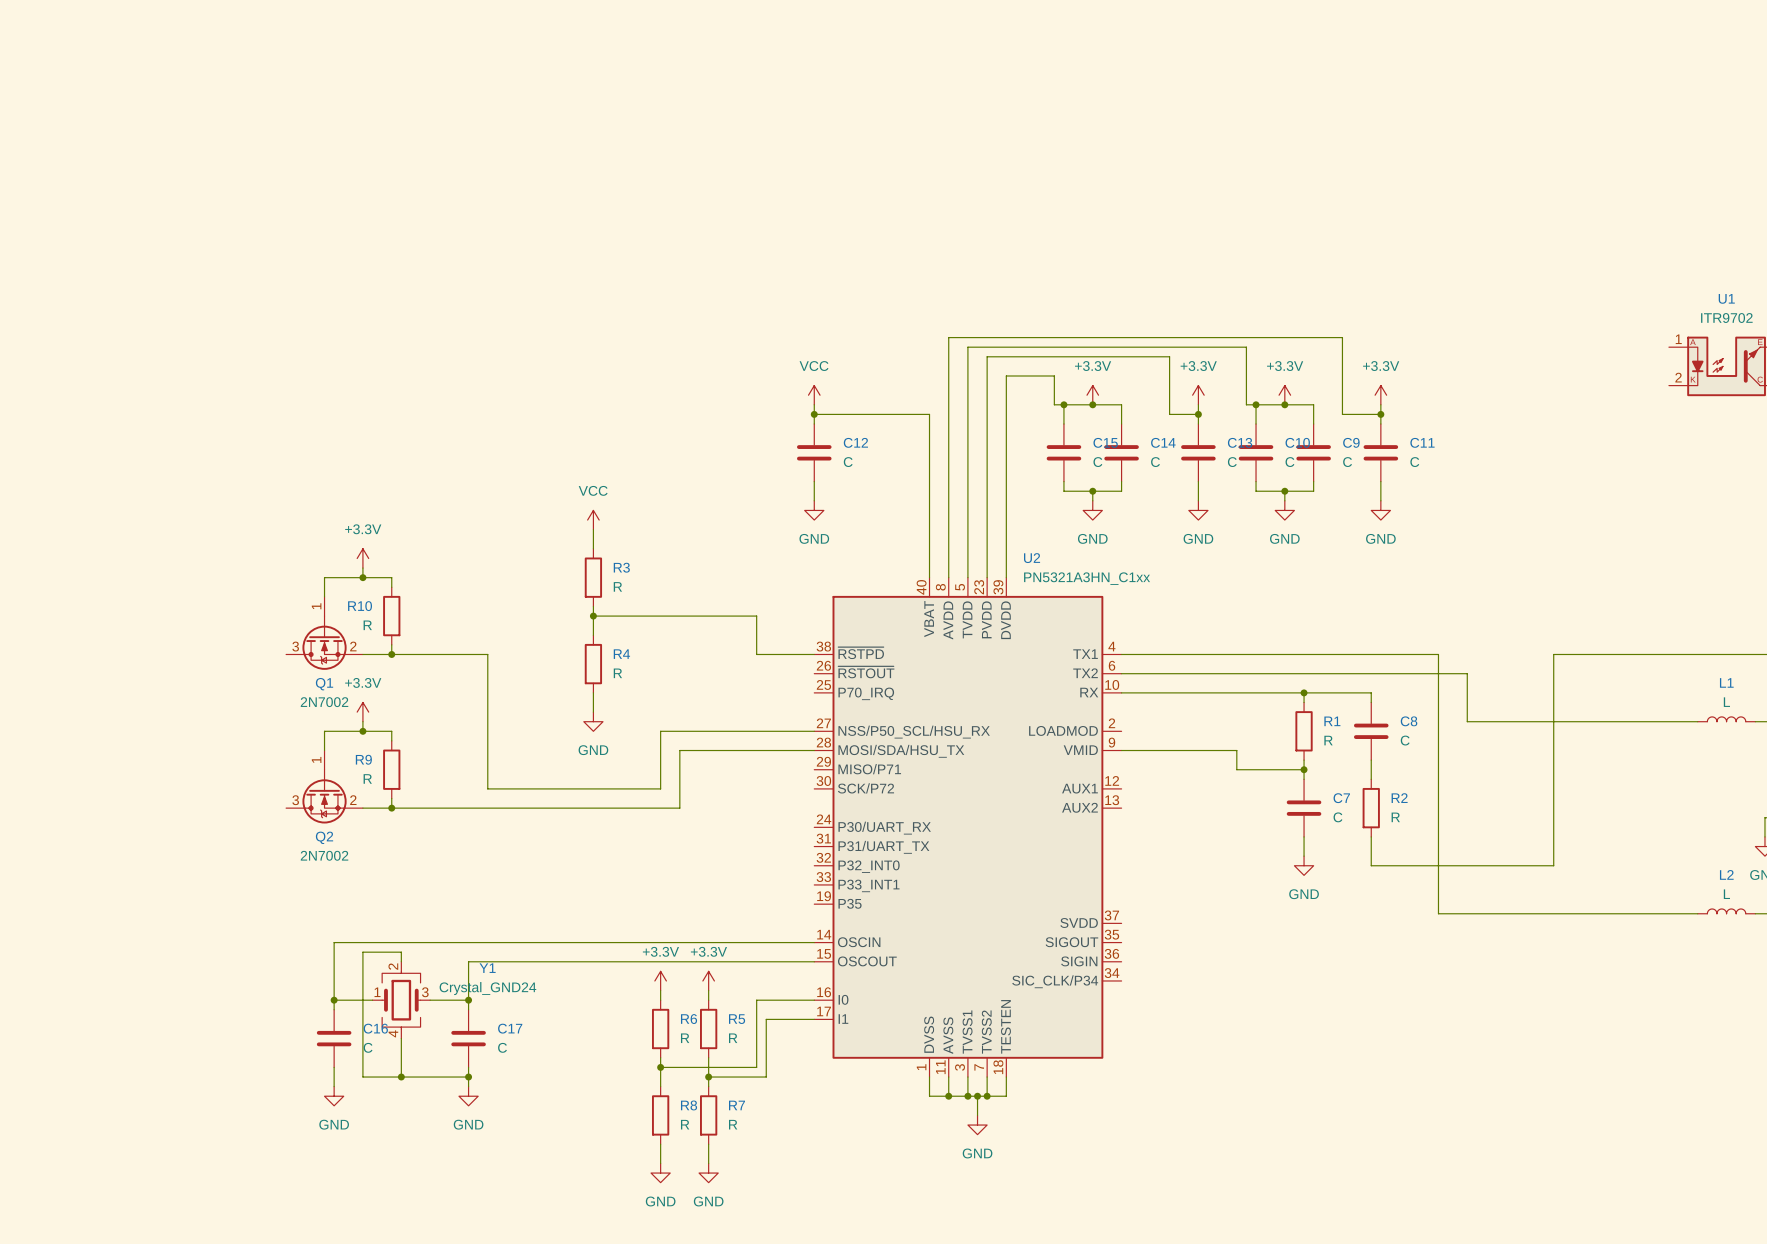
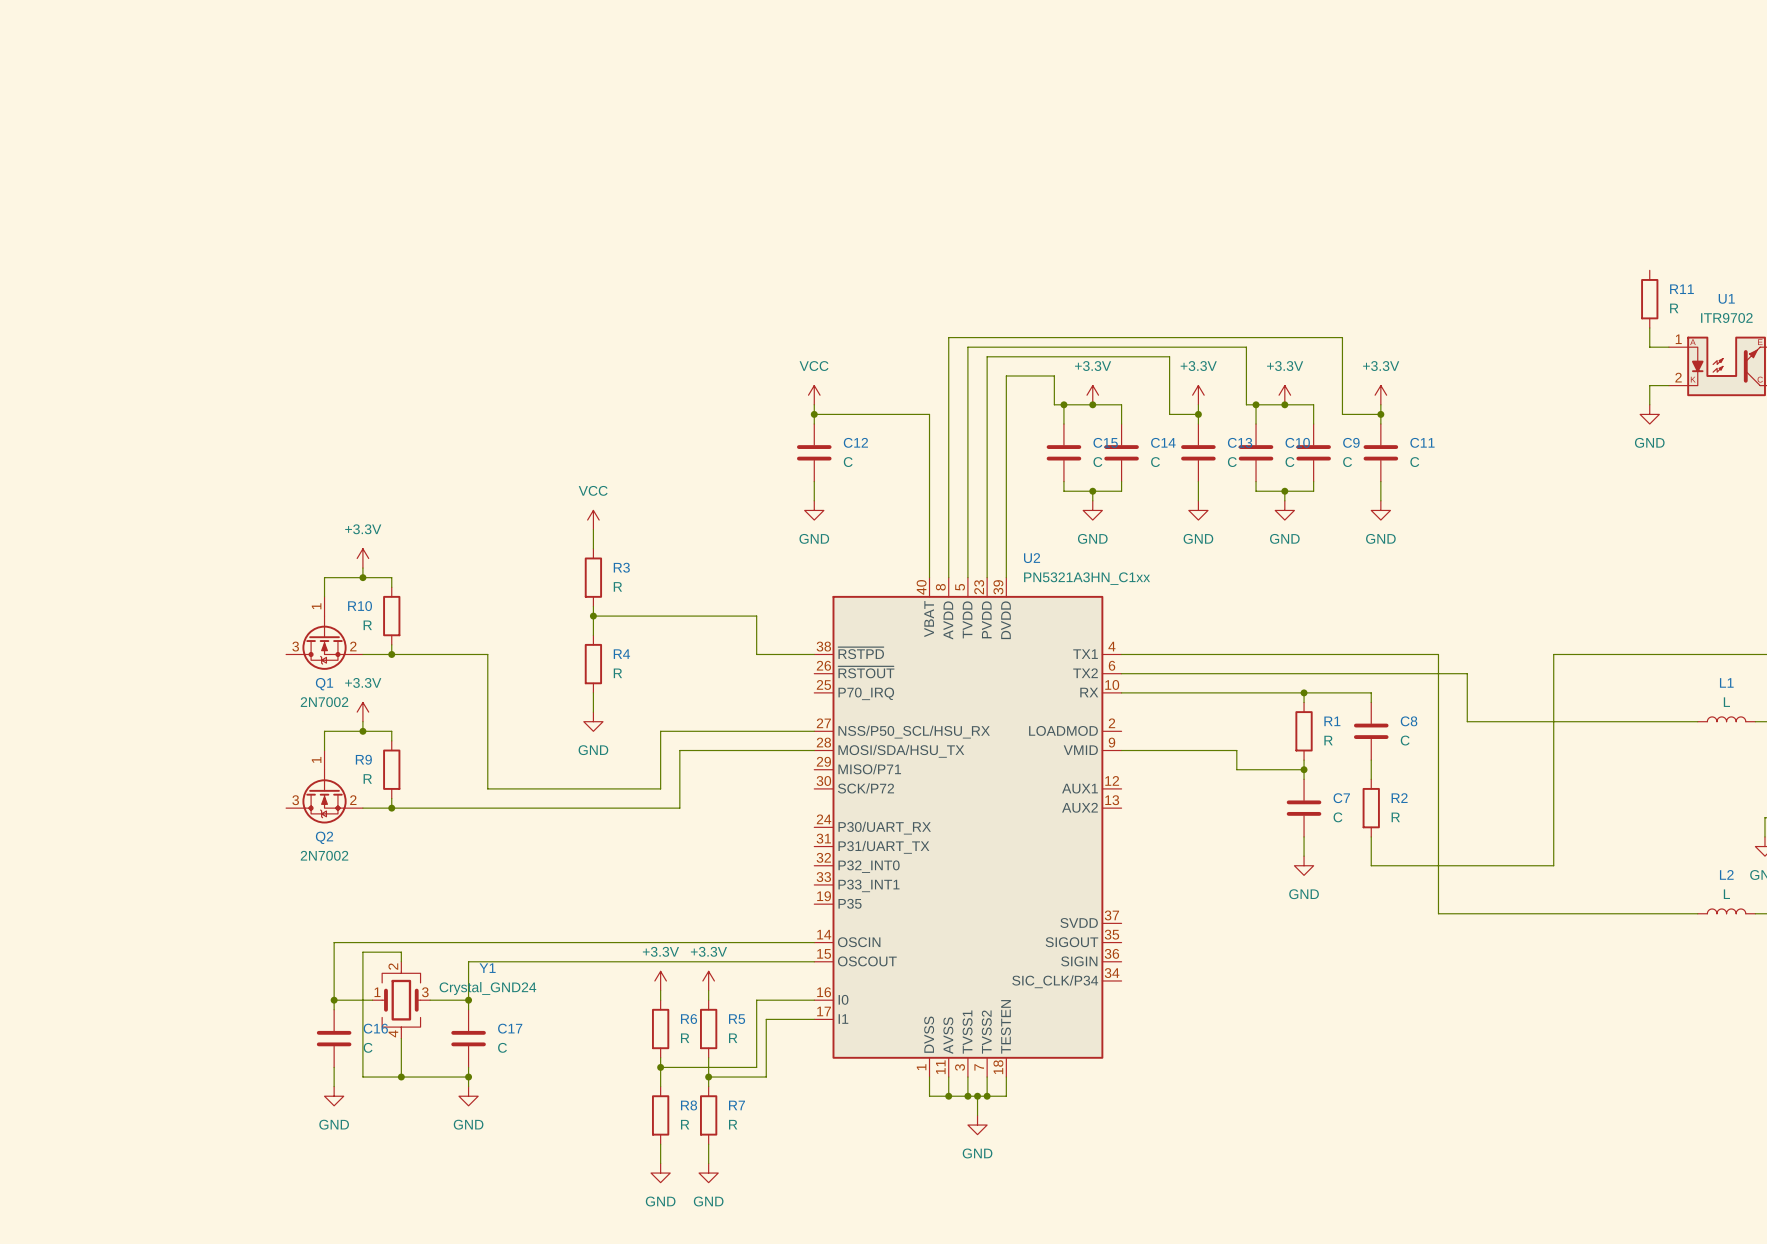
R11: none -> R (1649, 299)
wire: none -> (1649, 327) (1649, 347) (1668, 347)
wire: none -> (1668, 385) (1649, 385) (1649, 404)
power symbol: none -> GND (1649, 414)

